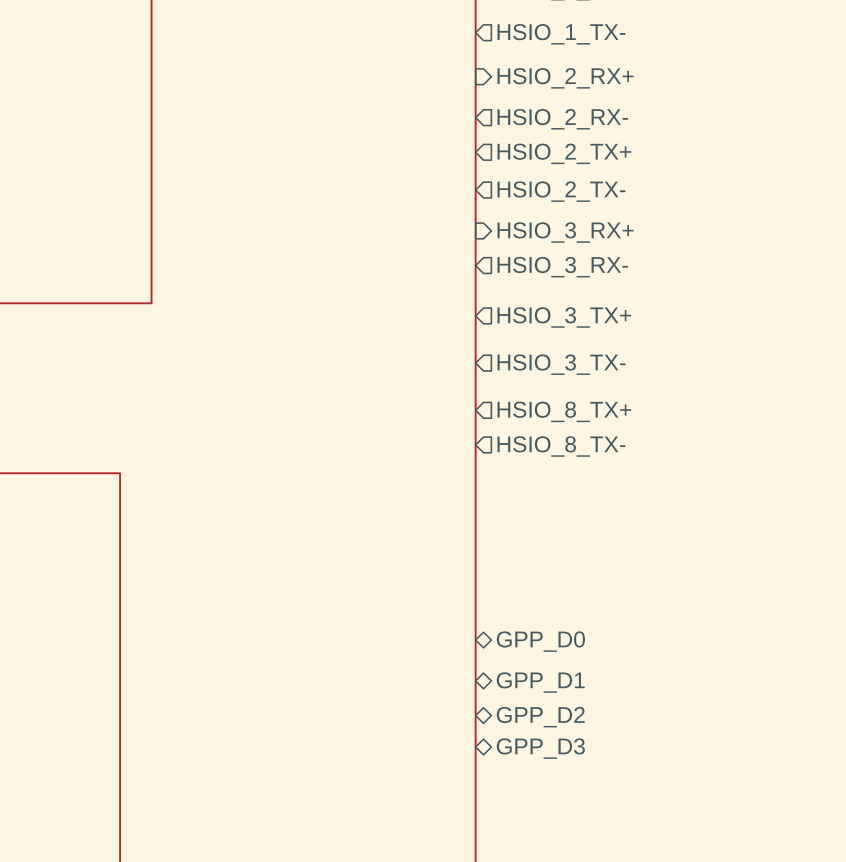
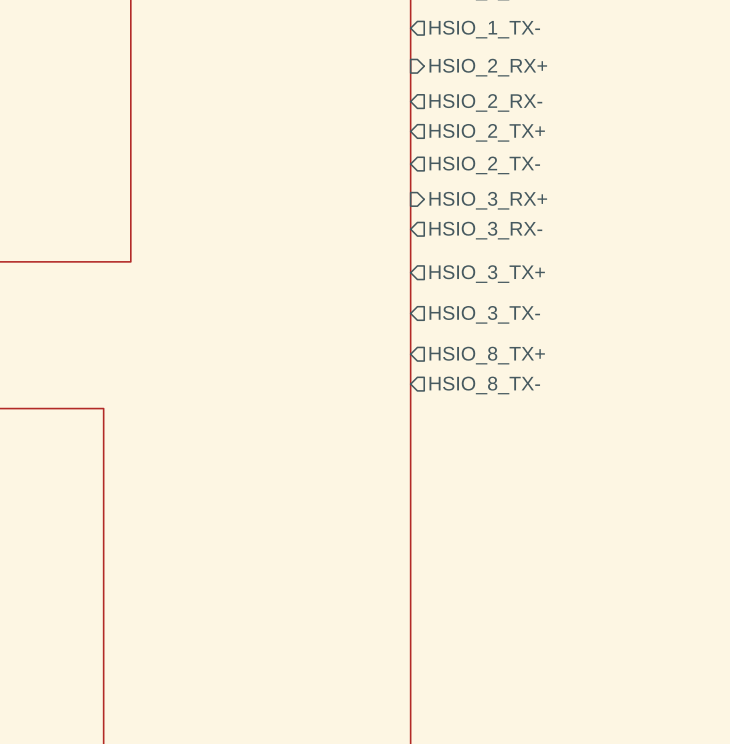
sheet pin: GPP_D0 (540, 641) -> none
sheet pin: GPP_D1 (540, 682) -> none
sheet pin: GPP_D2 (540, 717) -> none
sheet pin: GPP_D3 (540, 748) -> none

